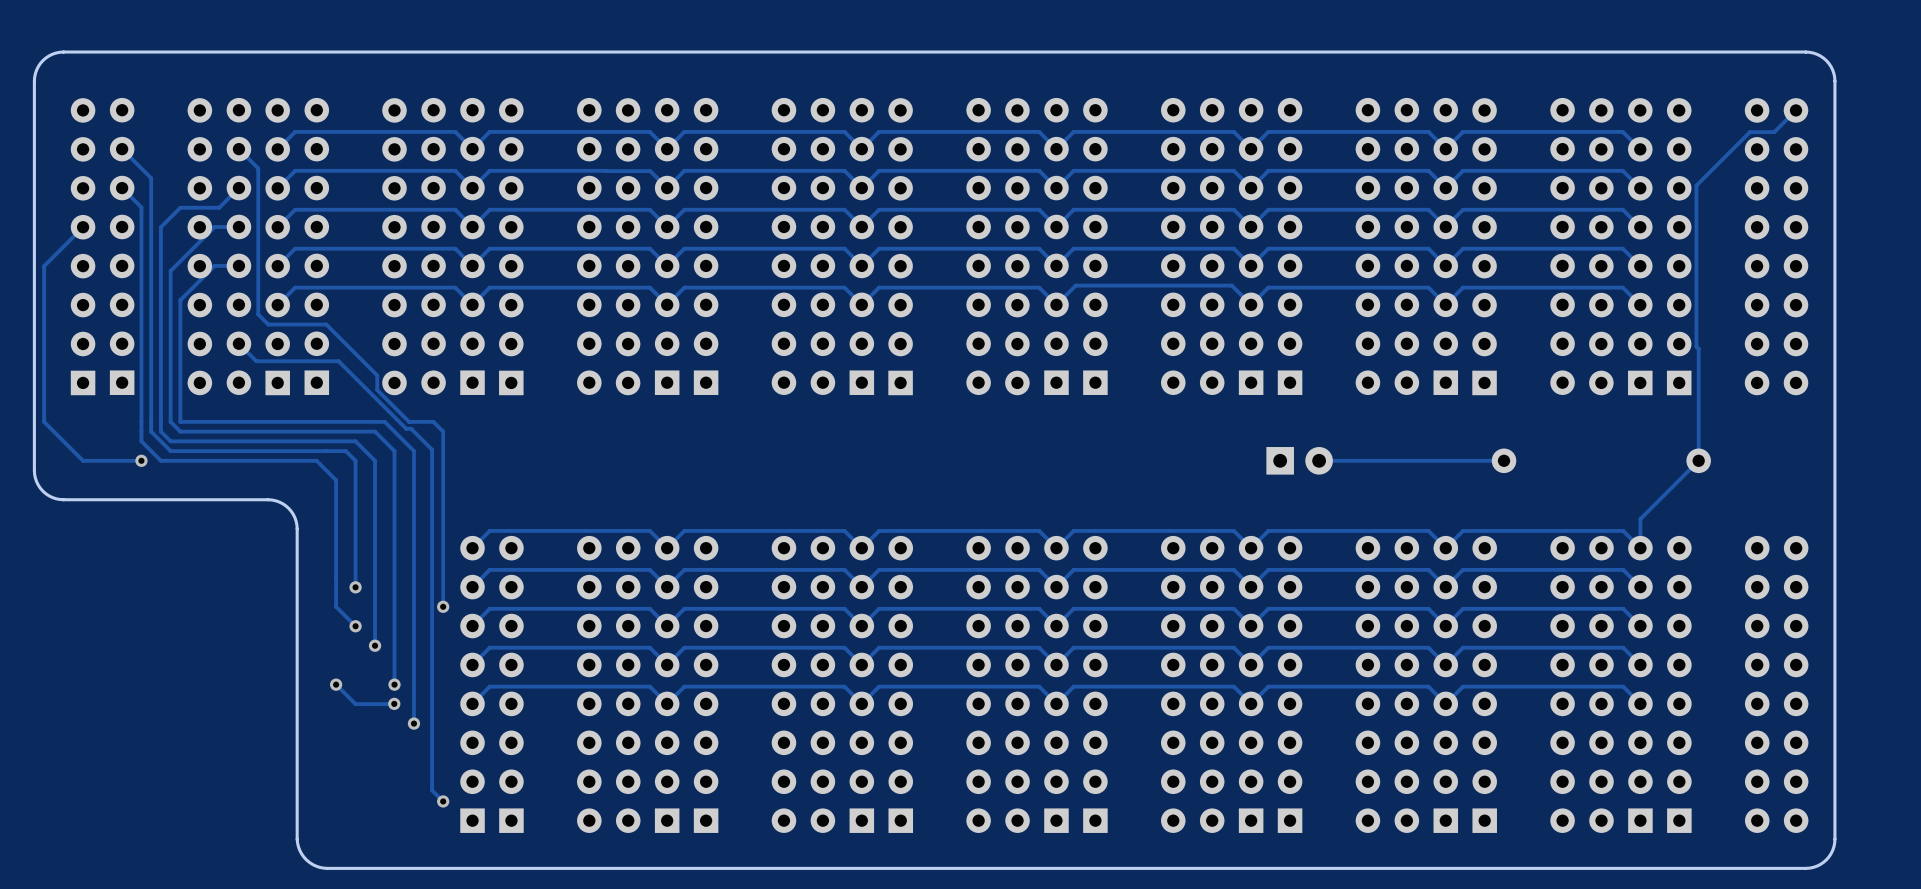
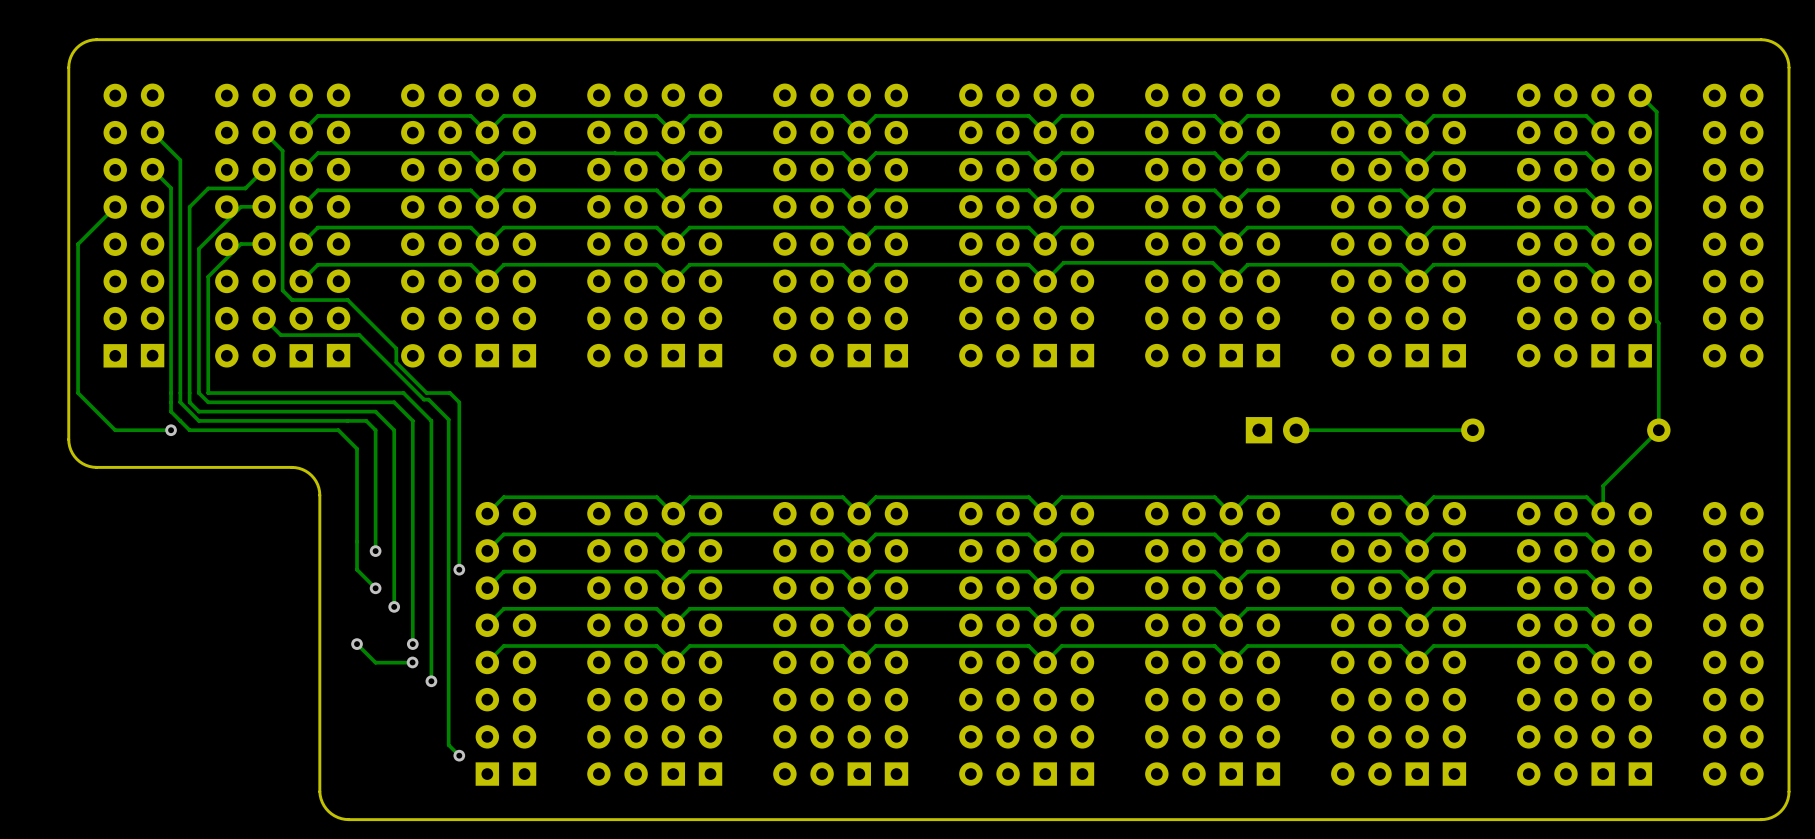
track: (1796, 110) (1774, 132) (1749, 132) (1696, 185) -> (1640, 95) (1656, 111) (1656, 167)

